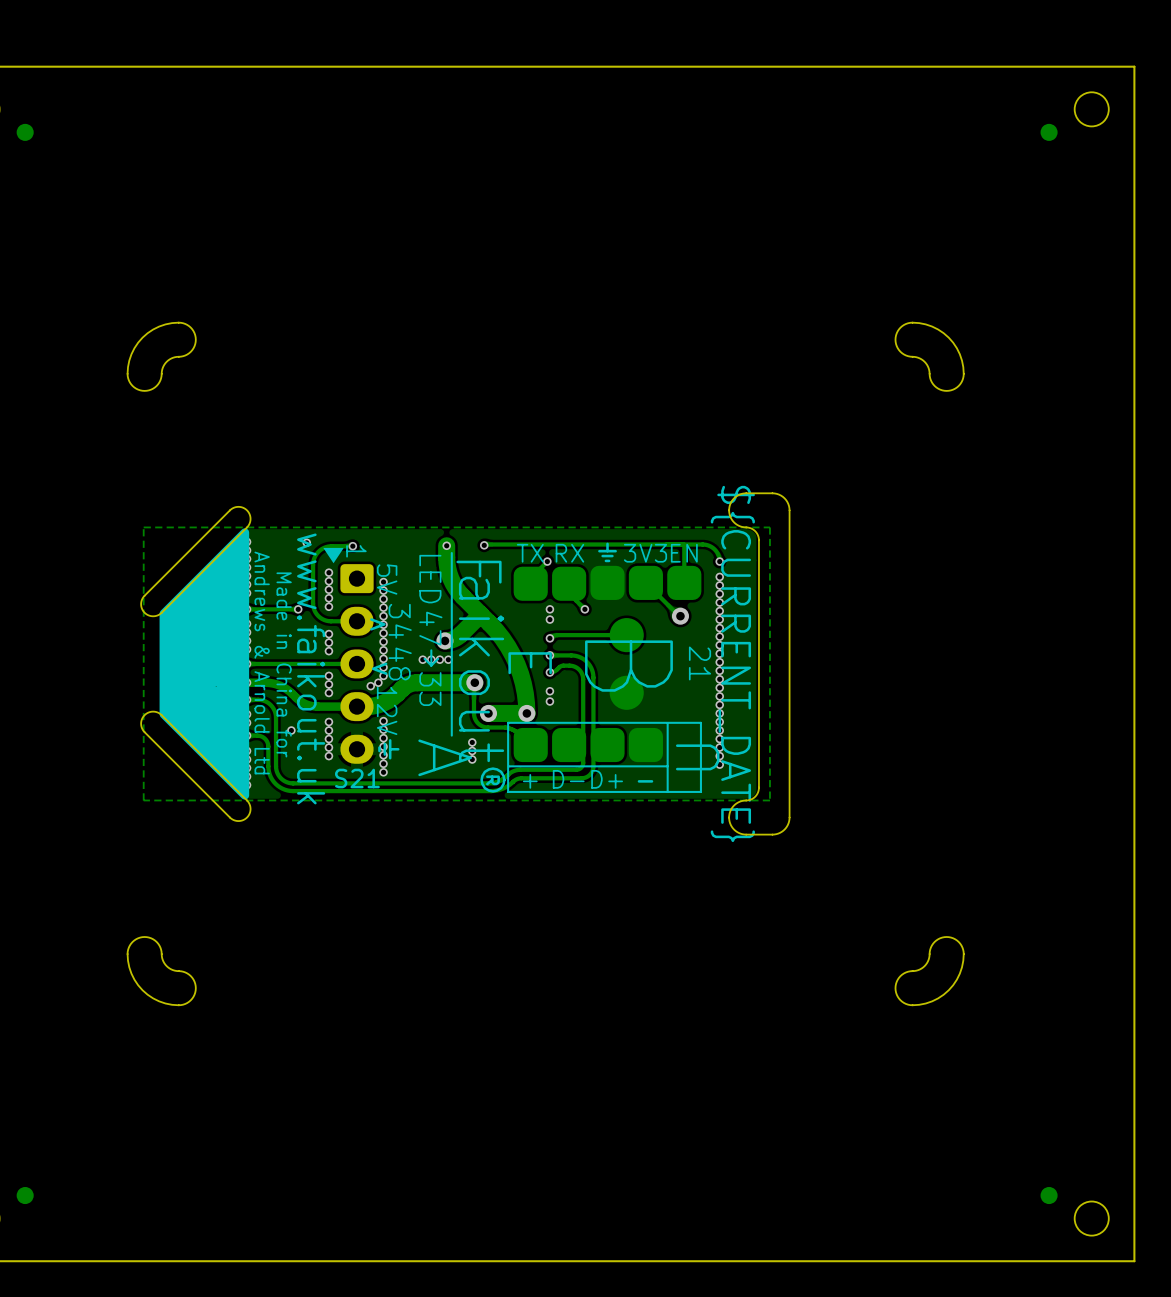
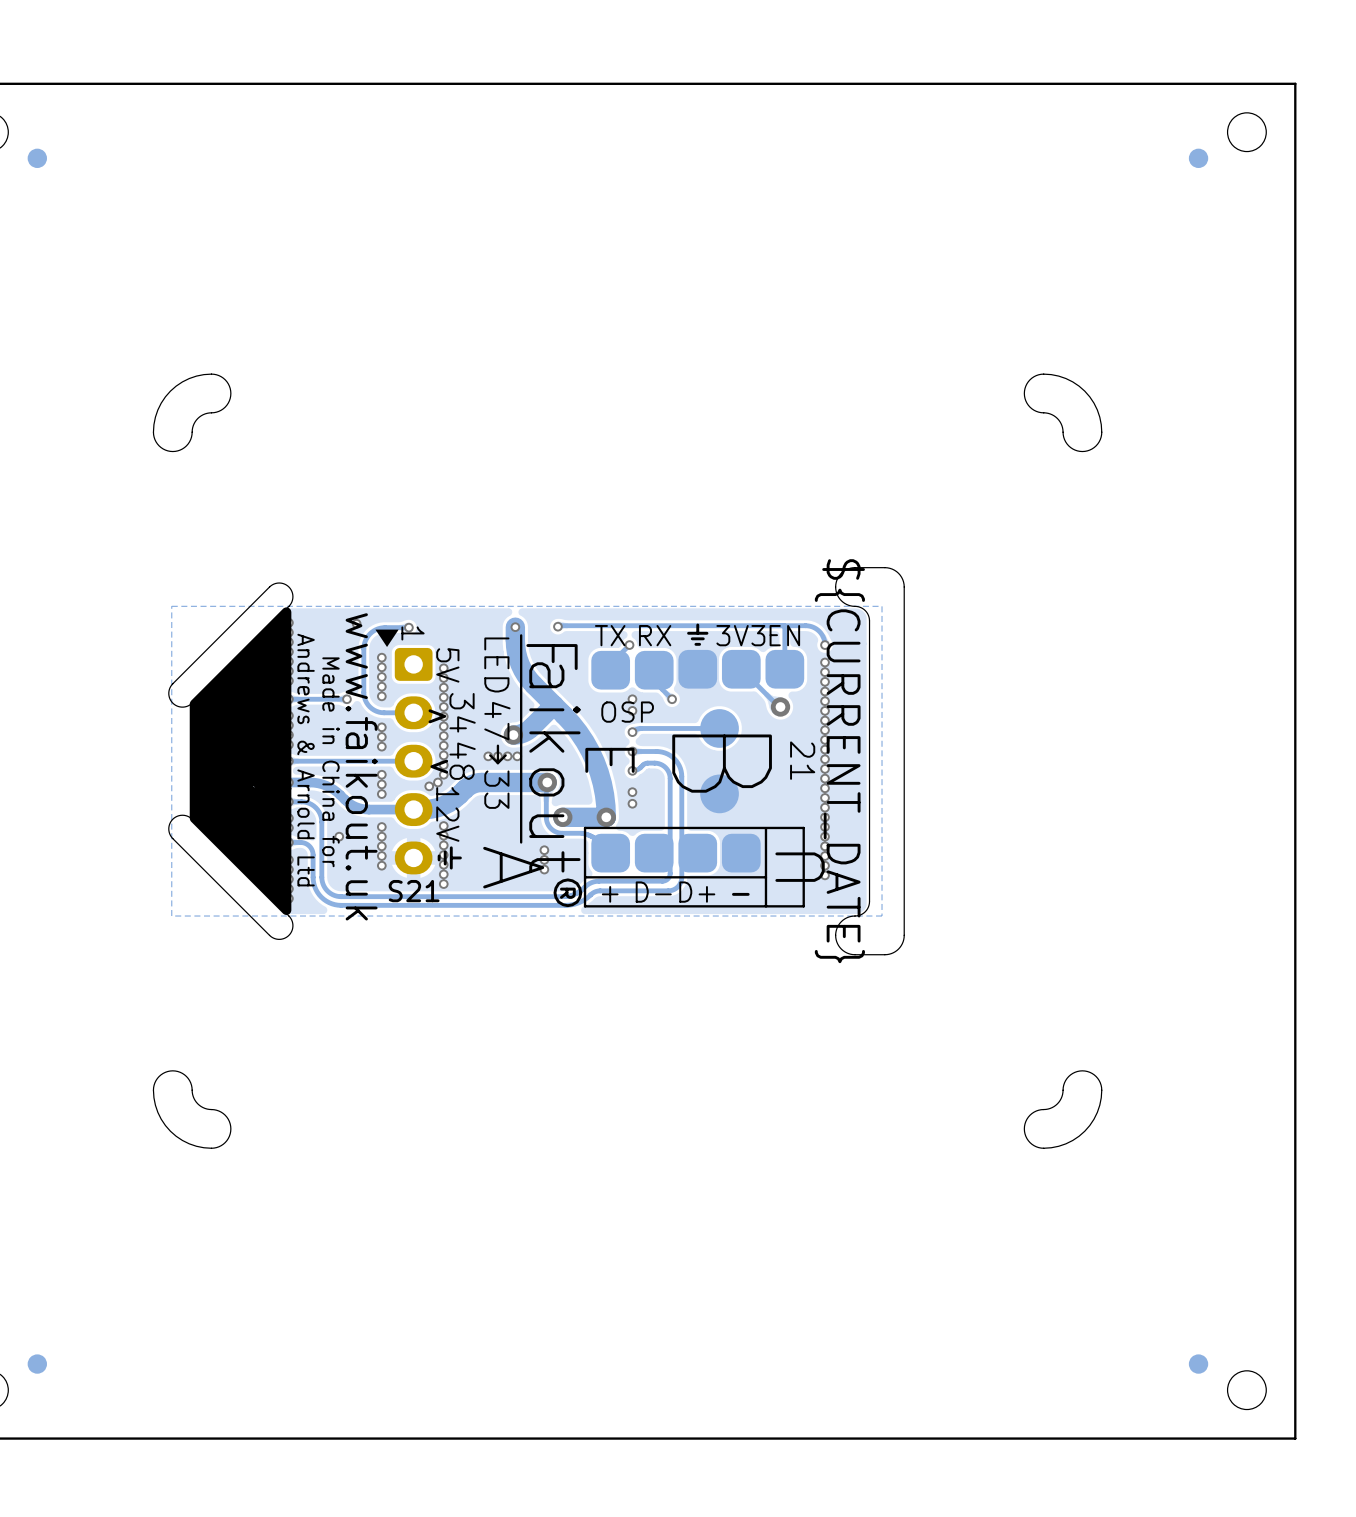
text: none -> OSP (627, 712)

